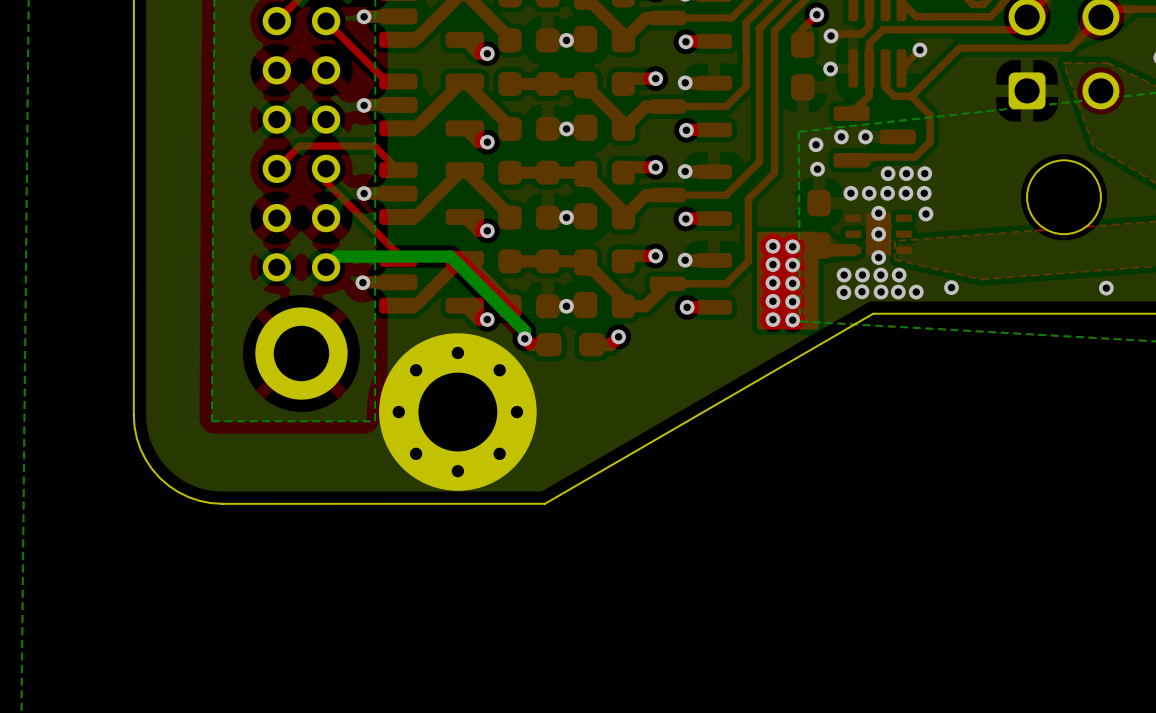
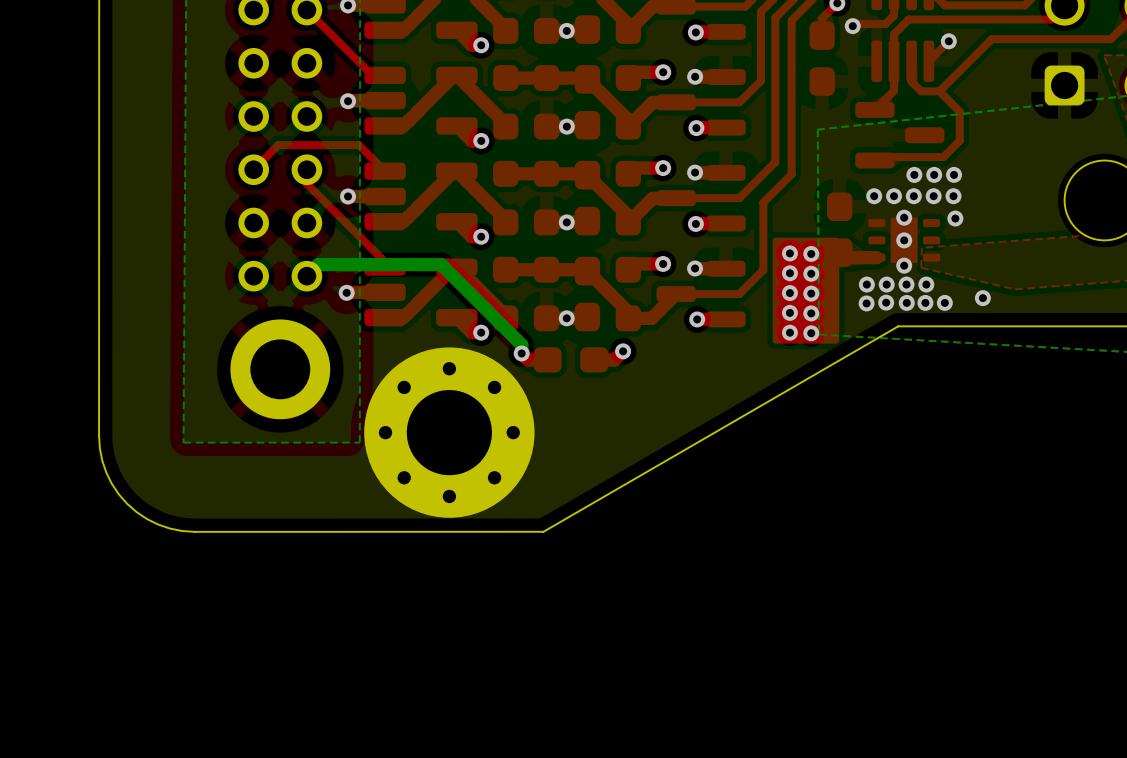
via: (830, 68) -> none
via: (841, 136) -> none
via: (865, 136) -> none
via: (816, 144) -> none
via: (817, 169) -> none

